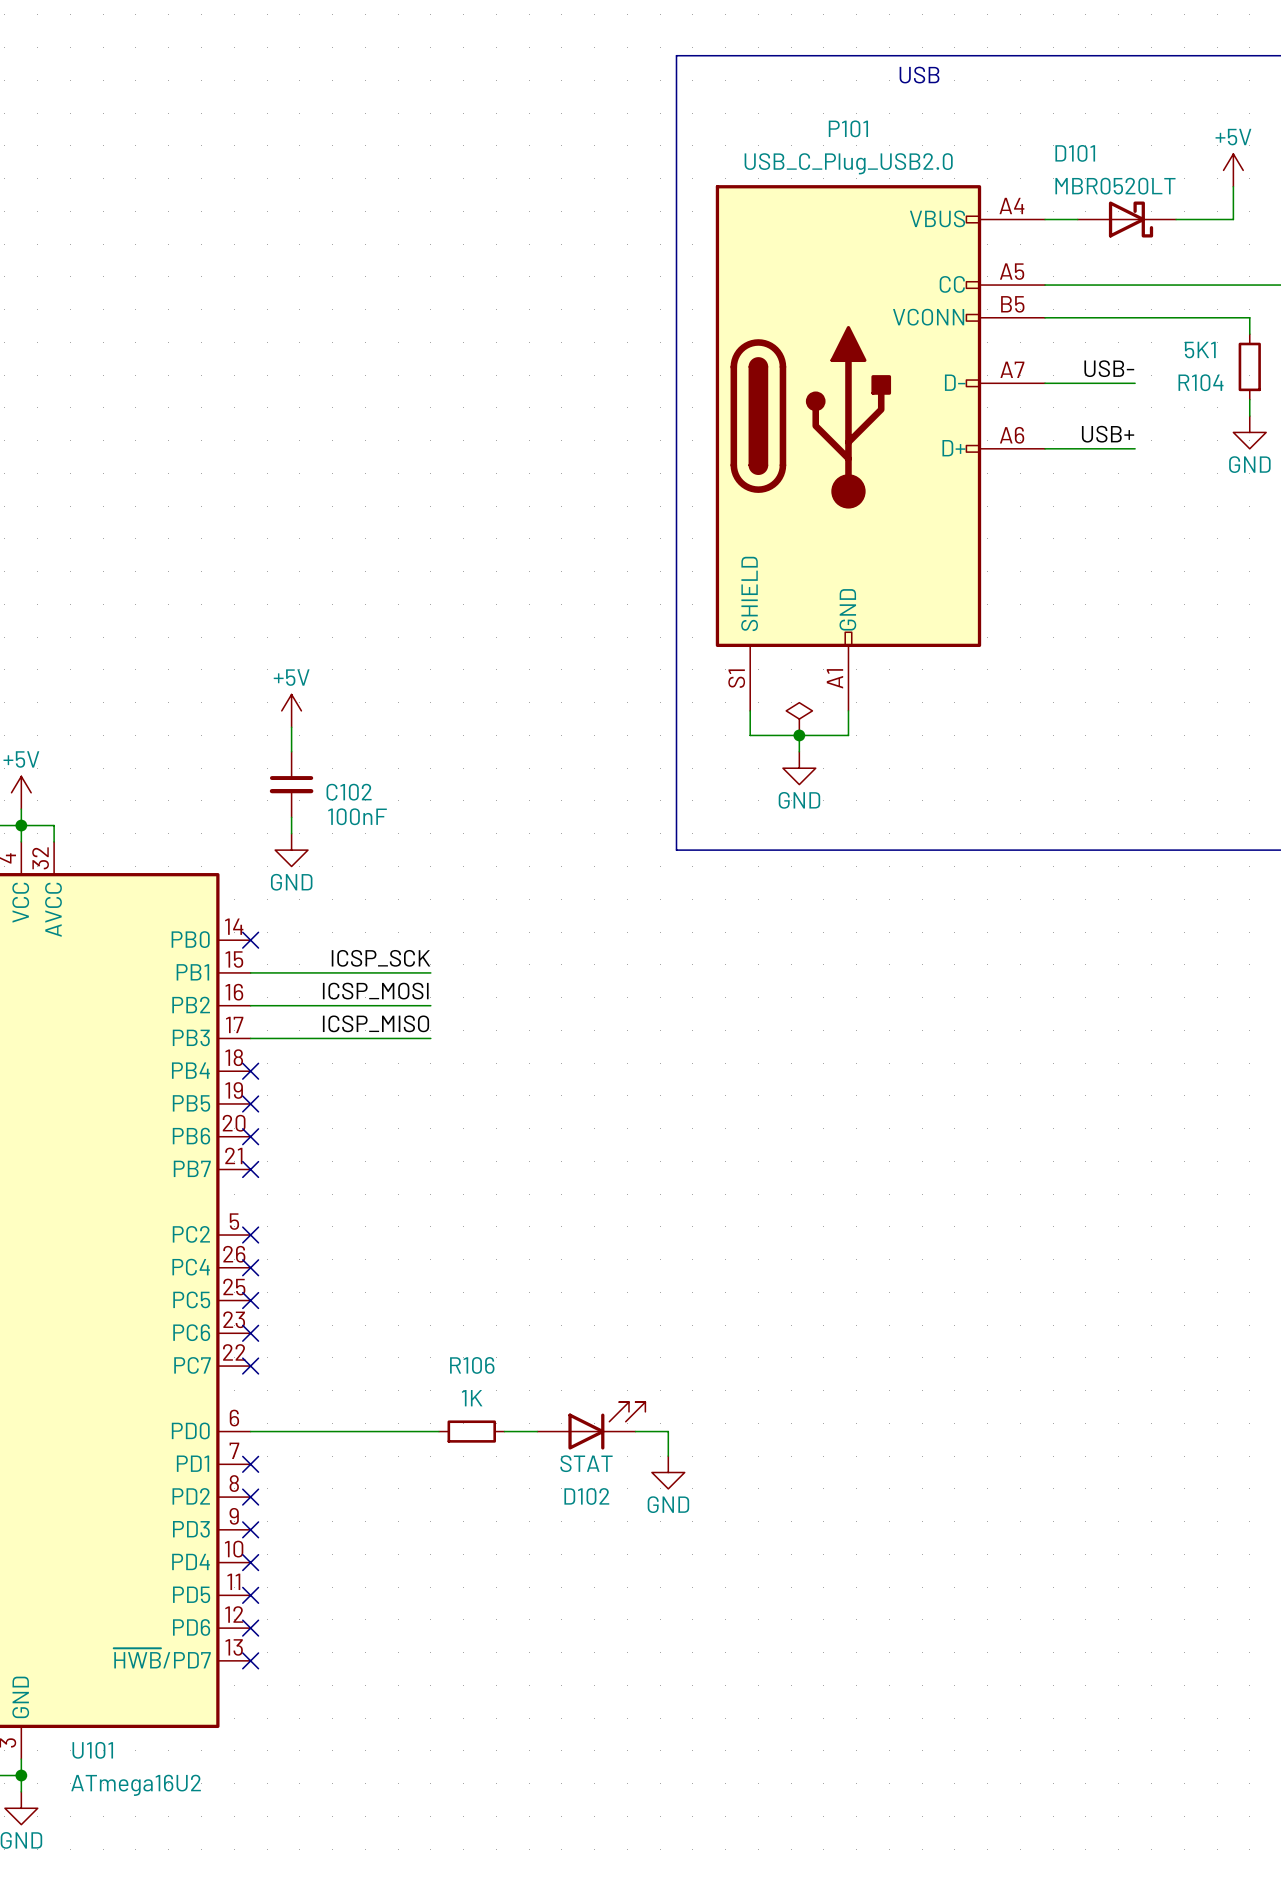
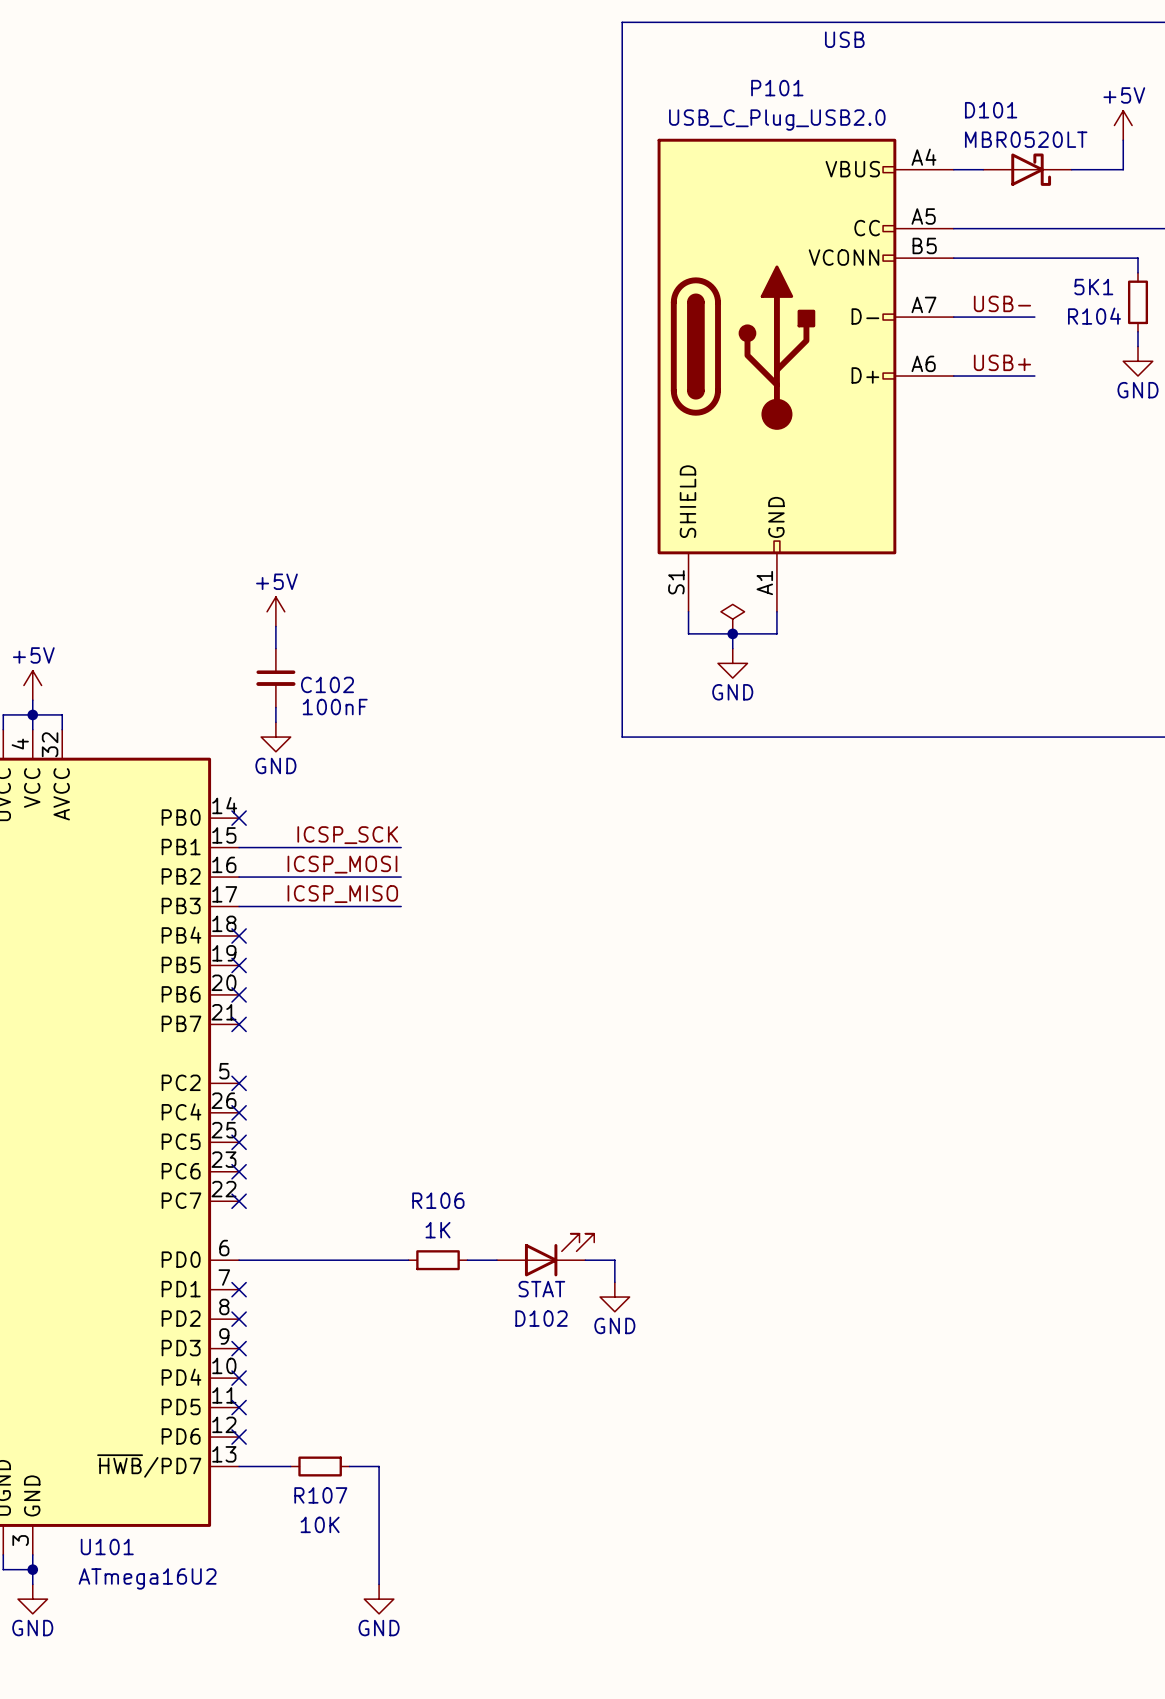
wire: none -> (239, 1466) (290, 1466)
no-connect mark: (250, 1660) -> none
R107: none -> 10K (320, 1466)
wire: none -> (349, 1466) (379, 1466) (379, 1584)
power symbol: none -> GND (379, 1599)

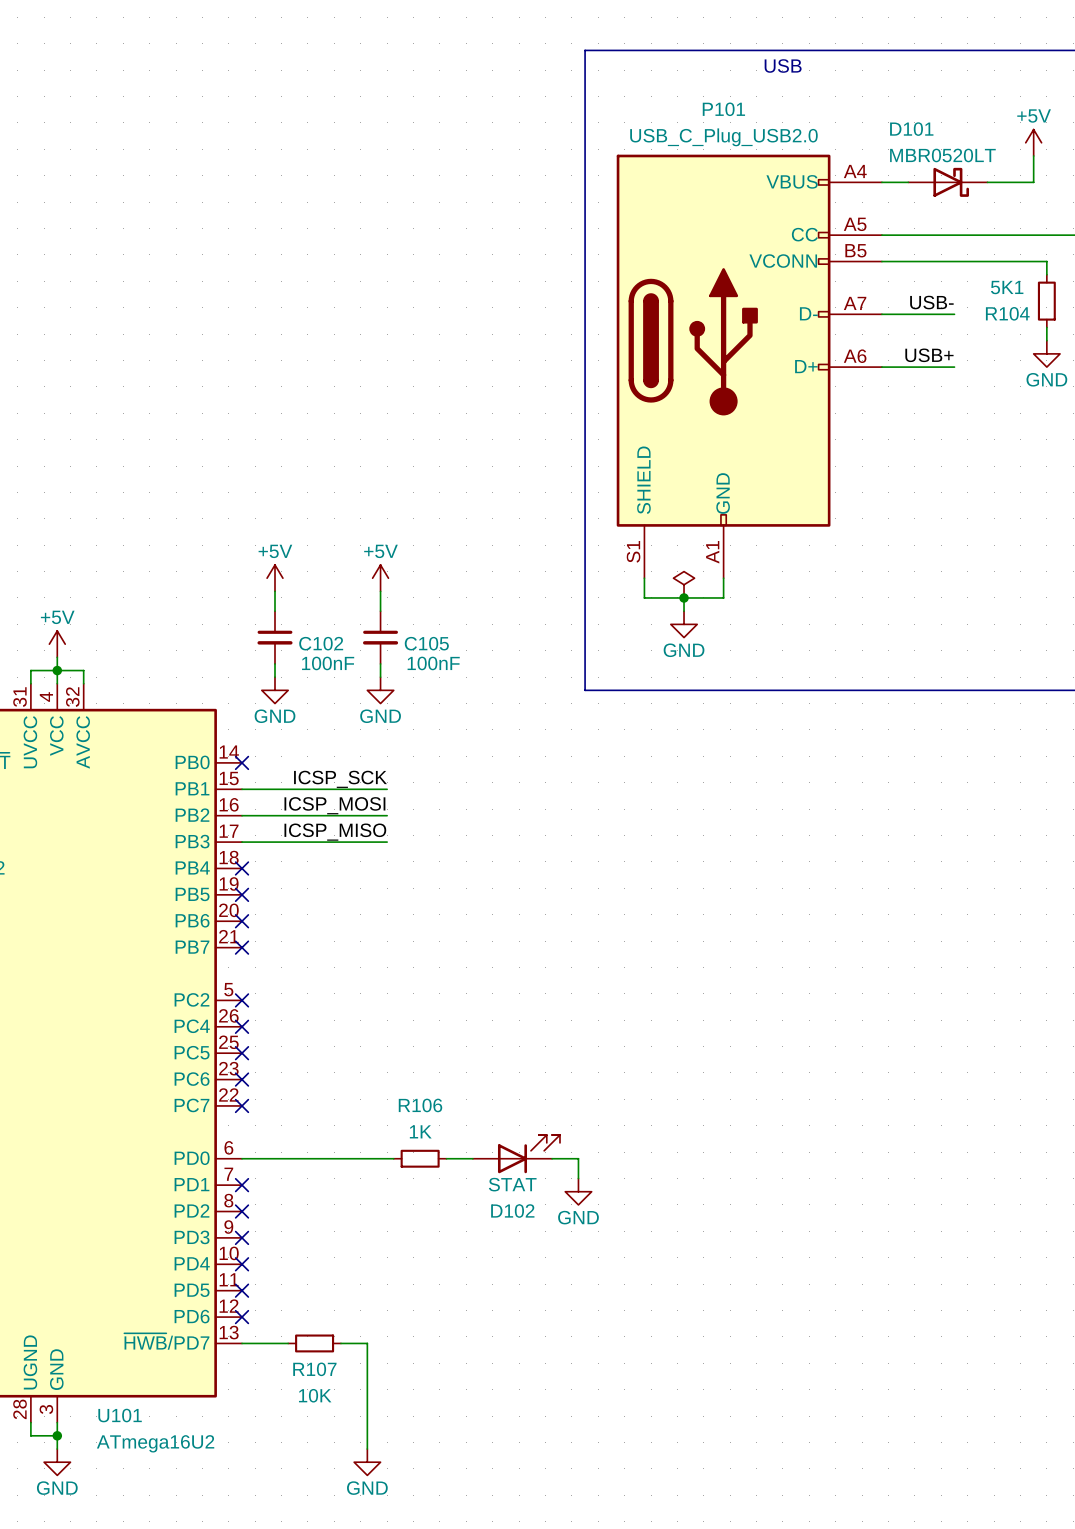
power symbol: none -> +5V (380, 578)
wire: none -> (380, 591) (380, 611)
C105: none -> 100nF (380, 637)
wire: none -> (380, 663) (380, 677)
power symbol: none -> GND (380, 690)

